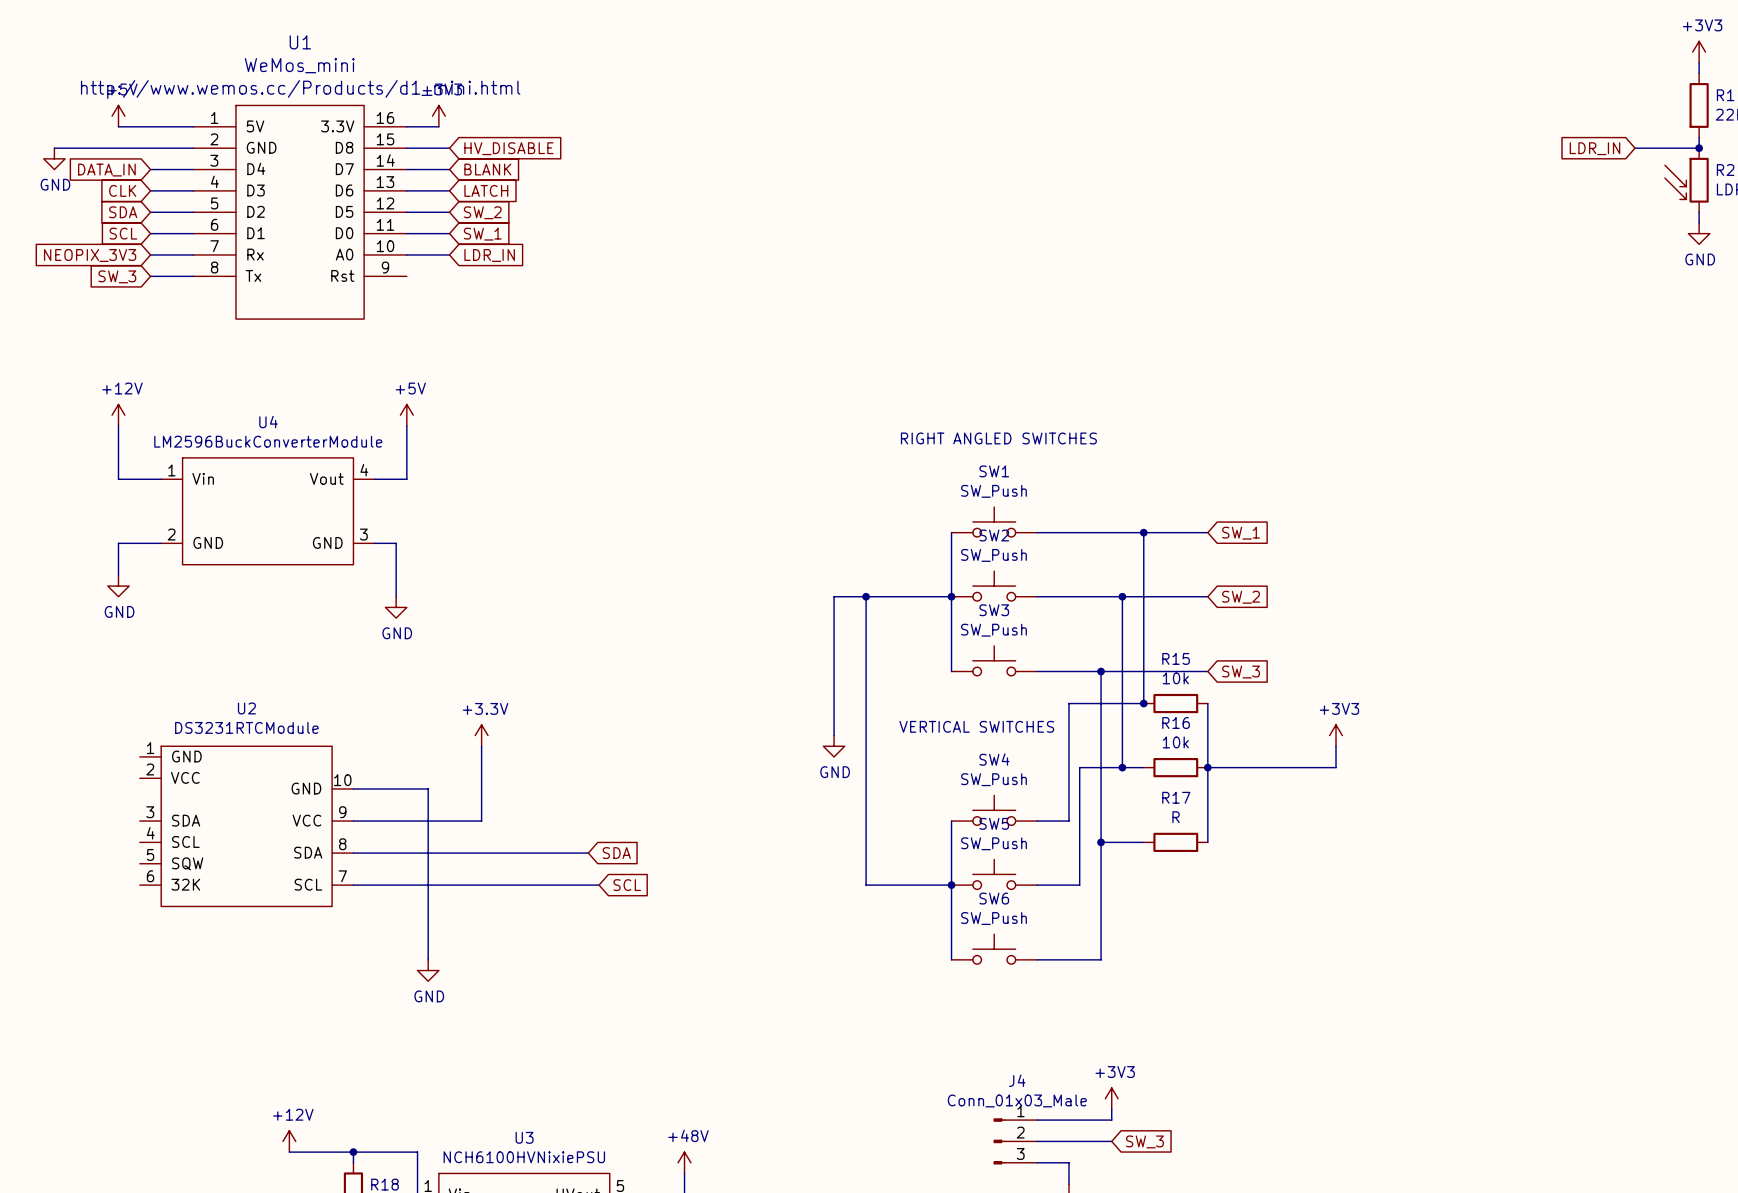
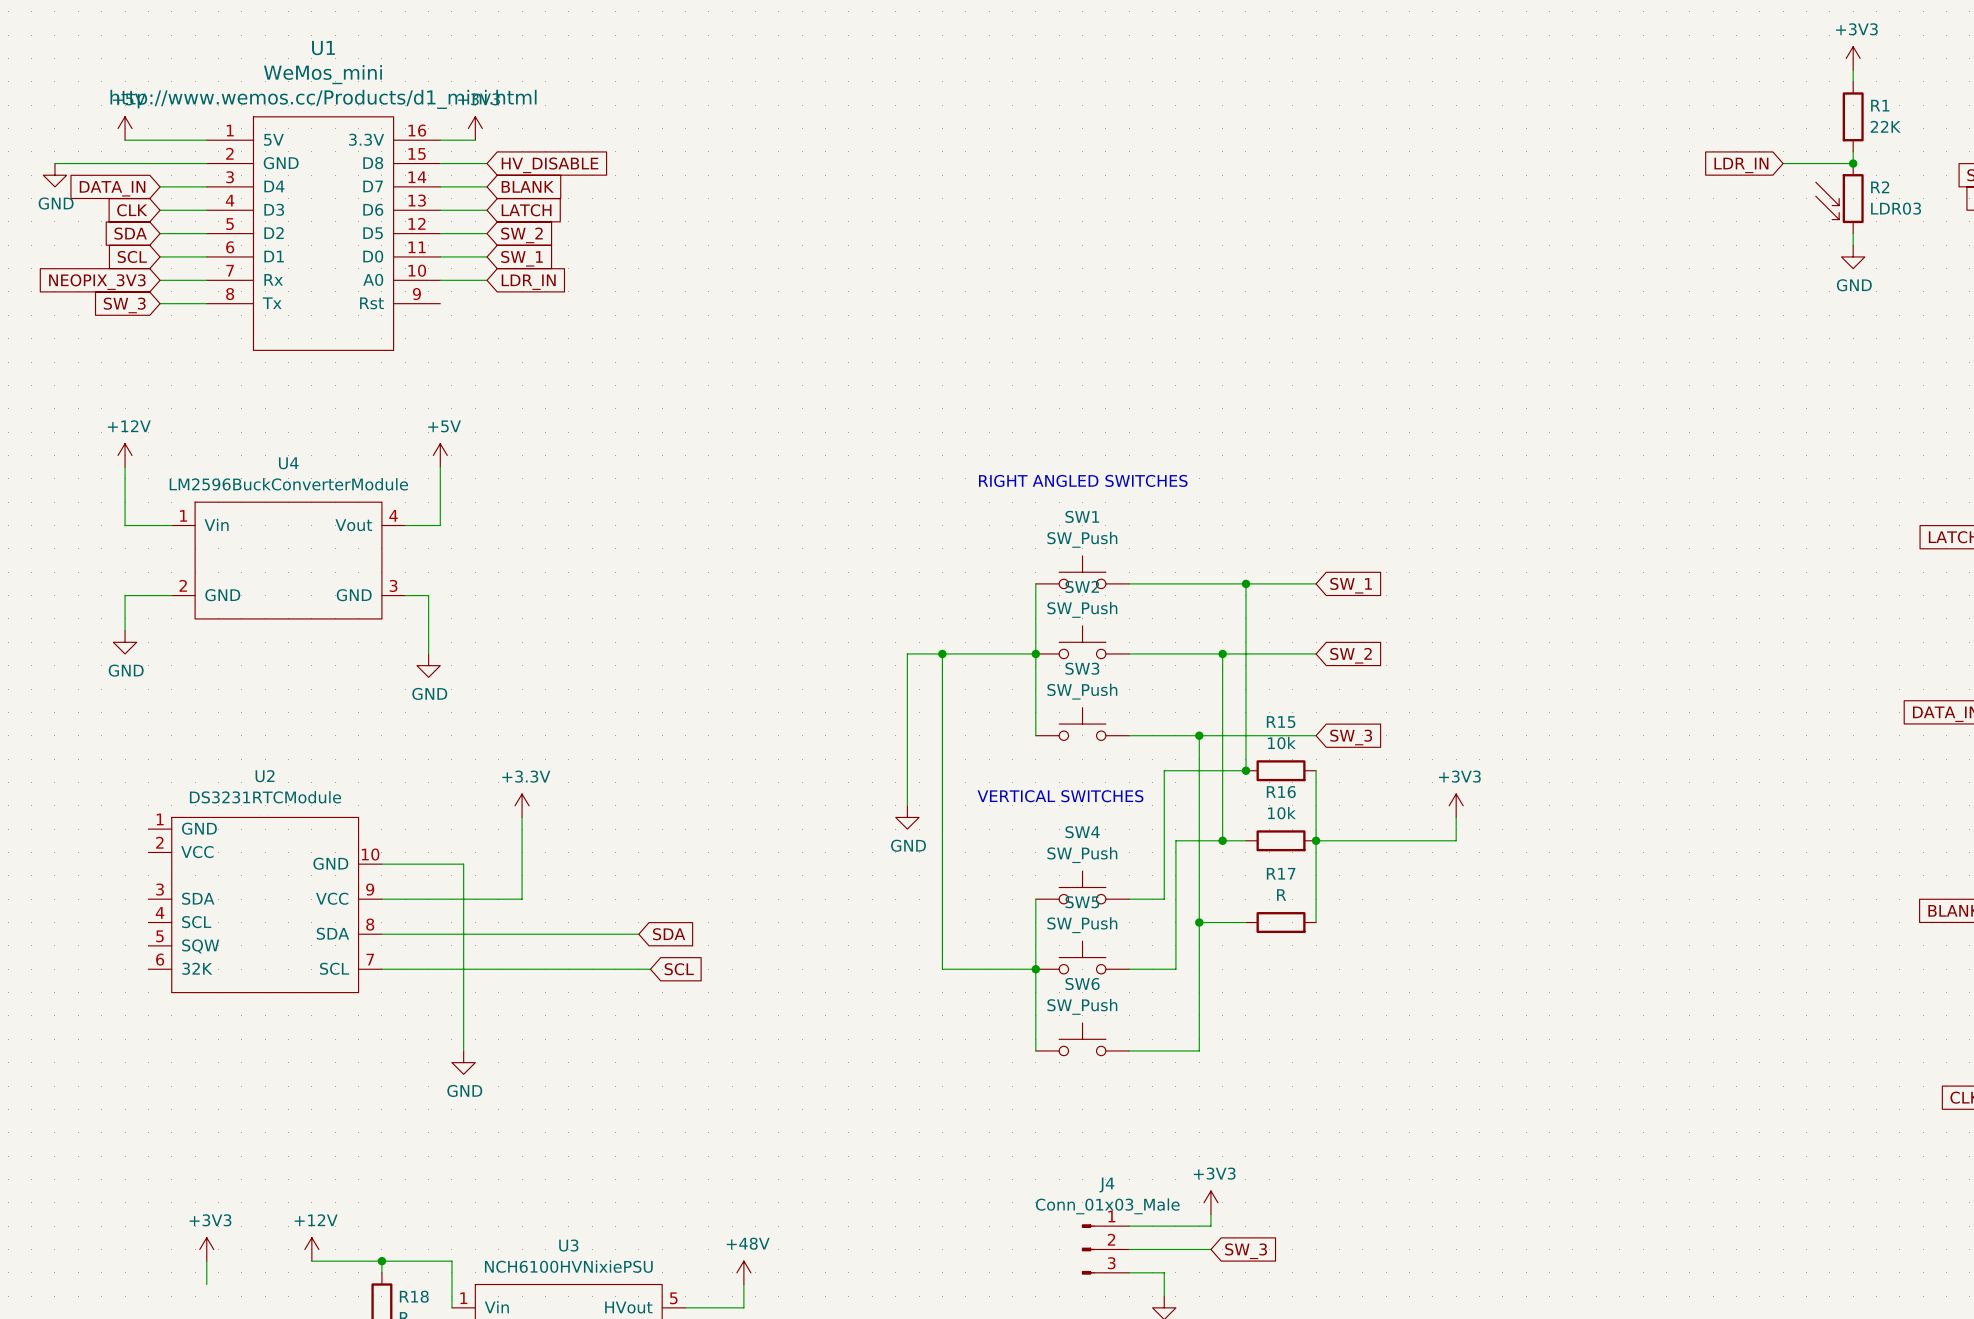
power symbol: none -> +3V3 (206, 1249)
wire: none -> (206, 1261) (206, 1284)

